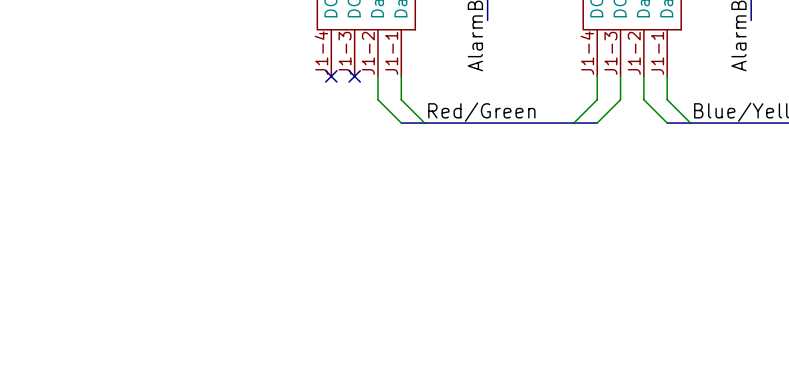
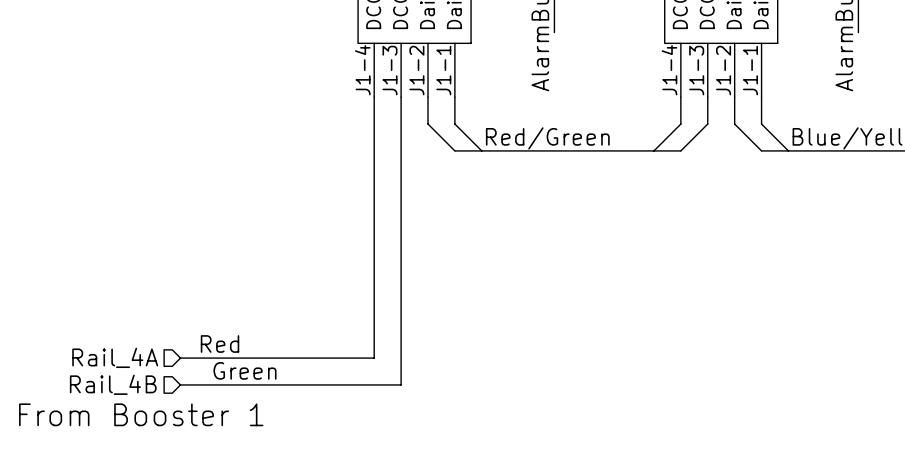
wire: none -> (374, 97) (374, 358) (180, 358)
no-connect mark: (331, 76) -> none
wire: none -> (401, 97) (401, 384) (180, 384)
no-connect mark: (354, 76) -> none
label: none -> Red (220, 343)
hierarchical label: none -> Rail_4A (115, 357)
label: none -> Green (244, 370)
hierarchical label: none -> Rail_4B (113, 384)
text: none -> From Booster 1 (141, 414)

